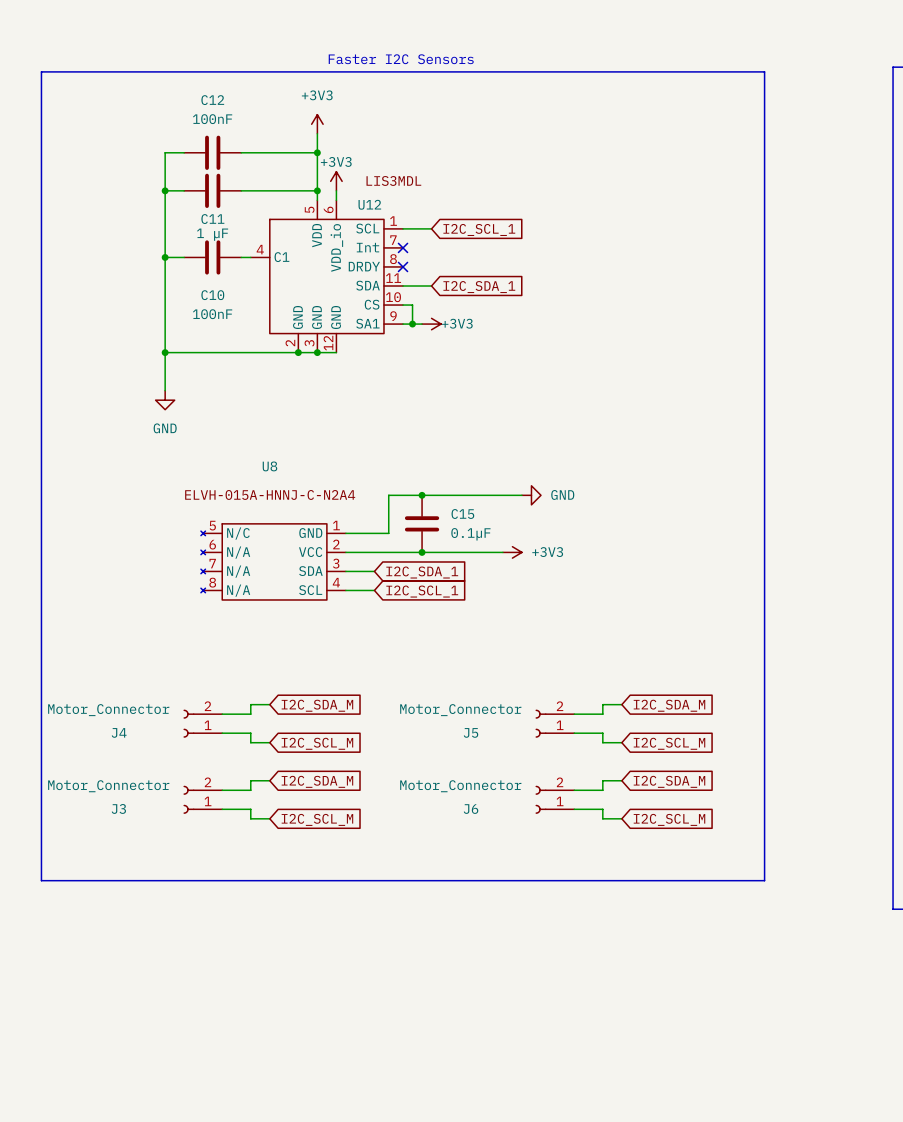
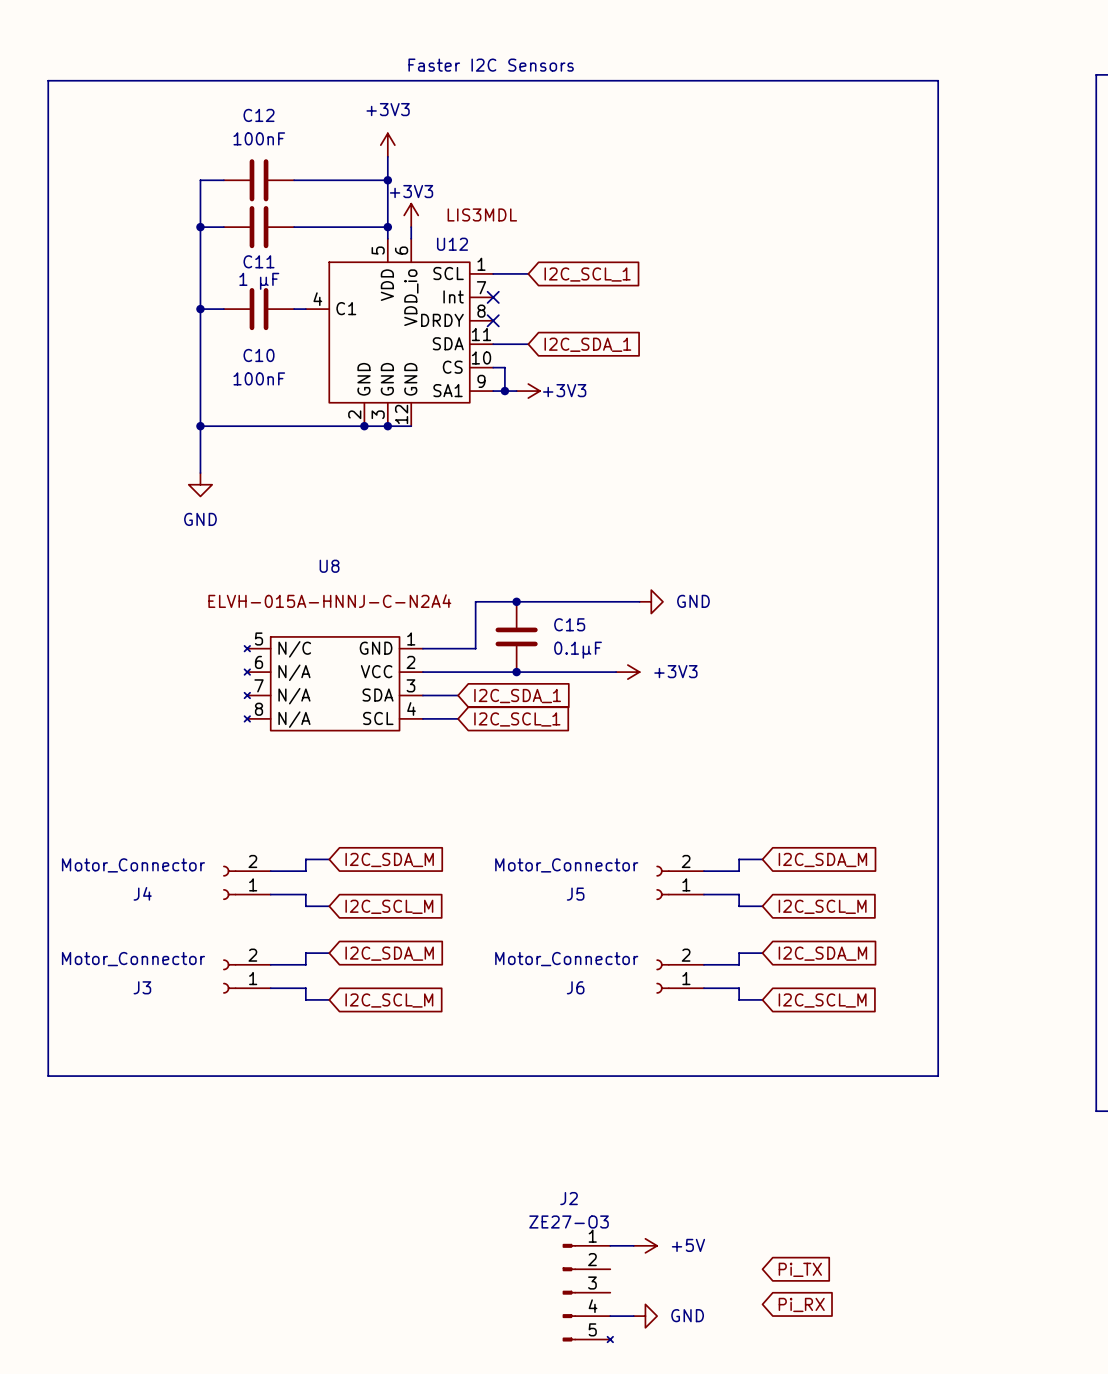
wire: none -> (610, 1245) (633, 1245)
power symbol: none -> +5V (645, 1245)
global label: none -> Pi_TX (800, 1269)
J2: none -> ZE27-O3 (587, 1293)
global label: none -> Pi_RX (801, 1304)
wire: none -> (610, 1316) (633, 1316)
power symbol: none -> GND (645, 1316)

